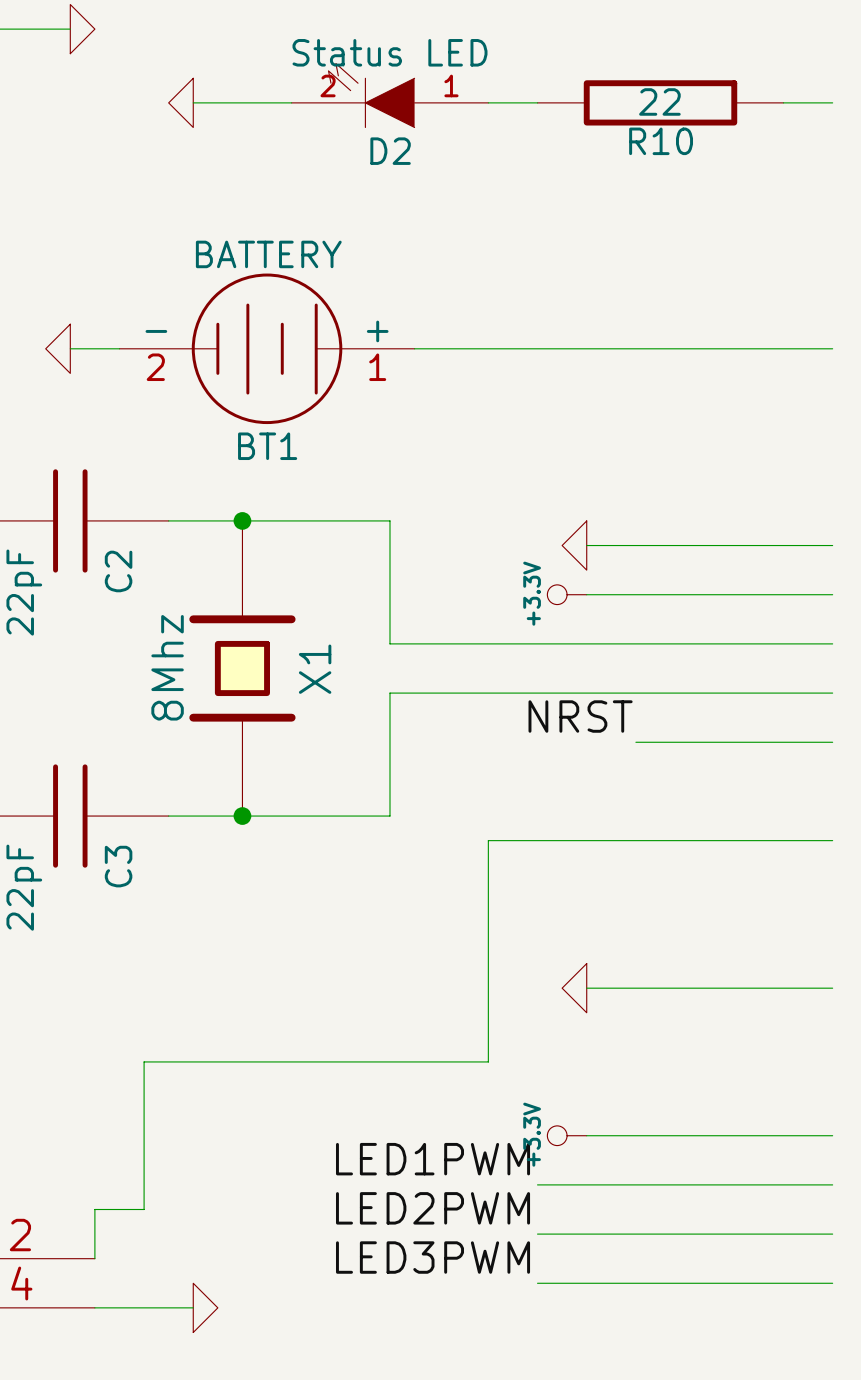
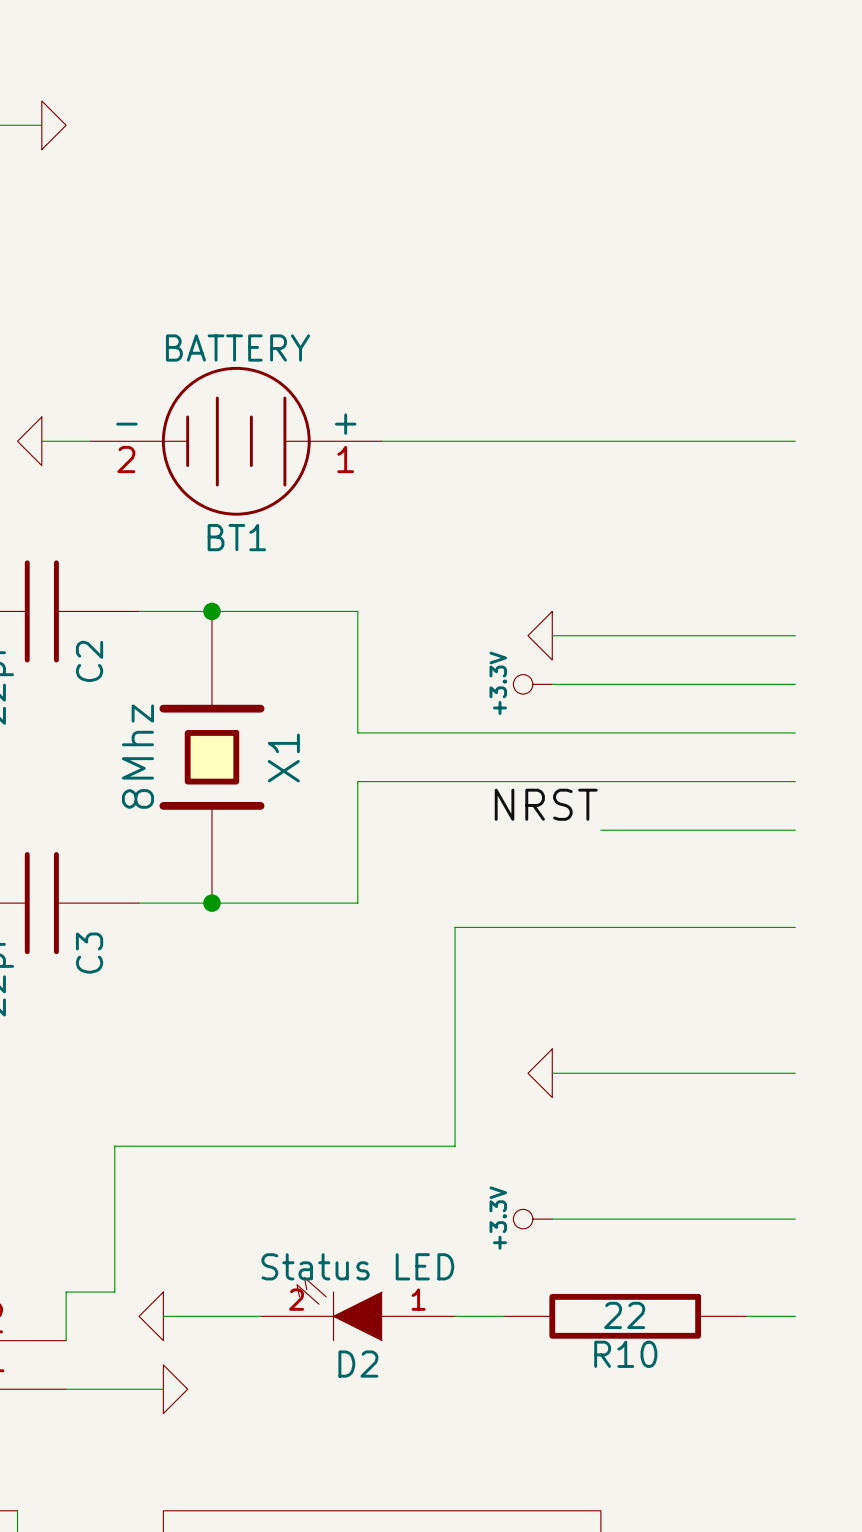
D2 position: (389, 95) -> (357, 1309)
power symbol: (180, 102) -> none
wire: (193, 102) (291, 102) -> none
wire: (488, 102) (537, 102) -> none
R10 position: (660, 102) -> (625, 1316)
wire: (783, 102) (832, 102) -> none
label: LED1PWM (433, 1159) -> none
wire: (537, 1184) (832, 1184) -> none
label: LED2PWM (433, 1208) -> none
power symbol: none -> (151, 1316)
wire: none -> (163, 1316) (260, 1316)
wire: (537, 1234) (783, 1234) -> (503, 1316) (455, 1316)
label: LED3PWM (433, 1257) -> none
wire: (537, 1283) (832, 1283) -> none

